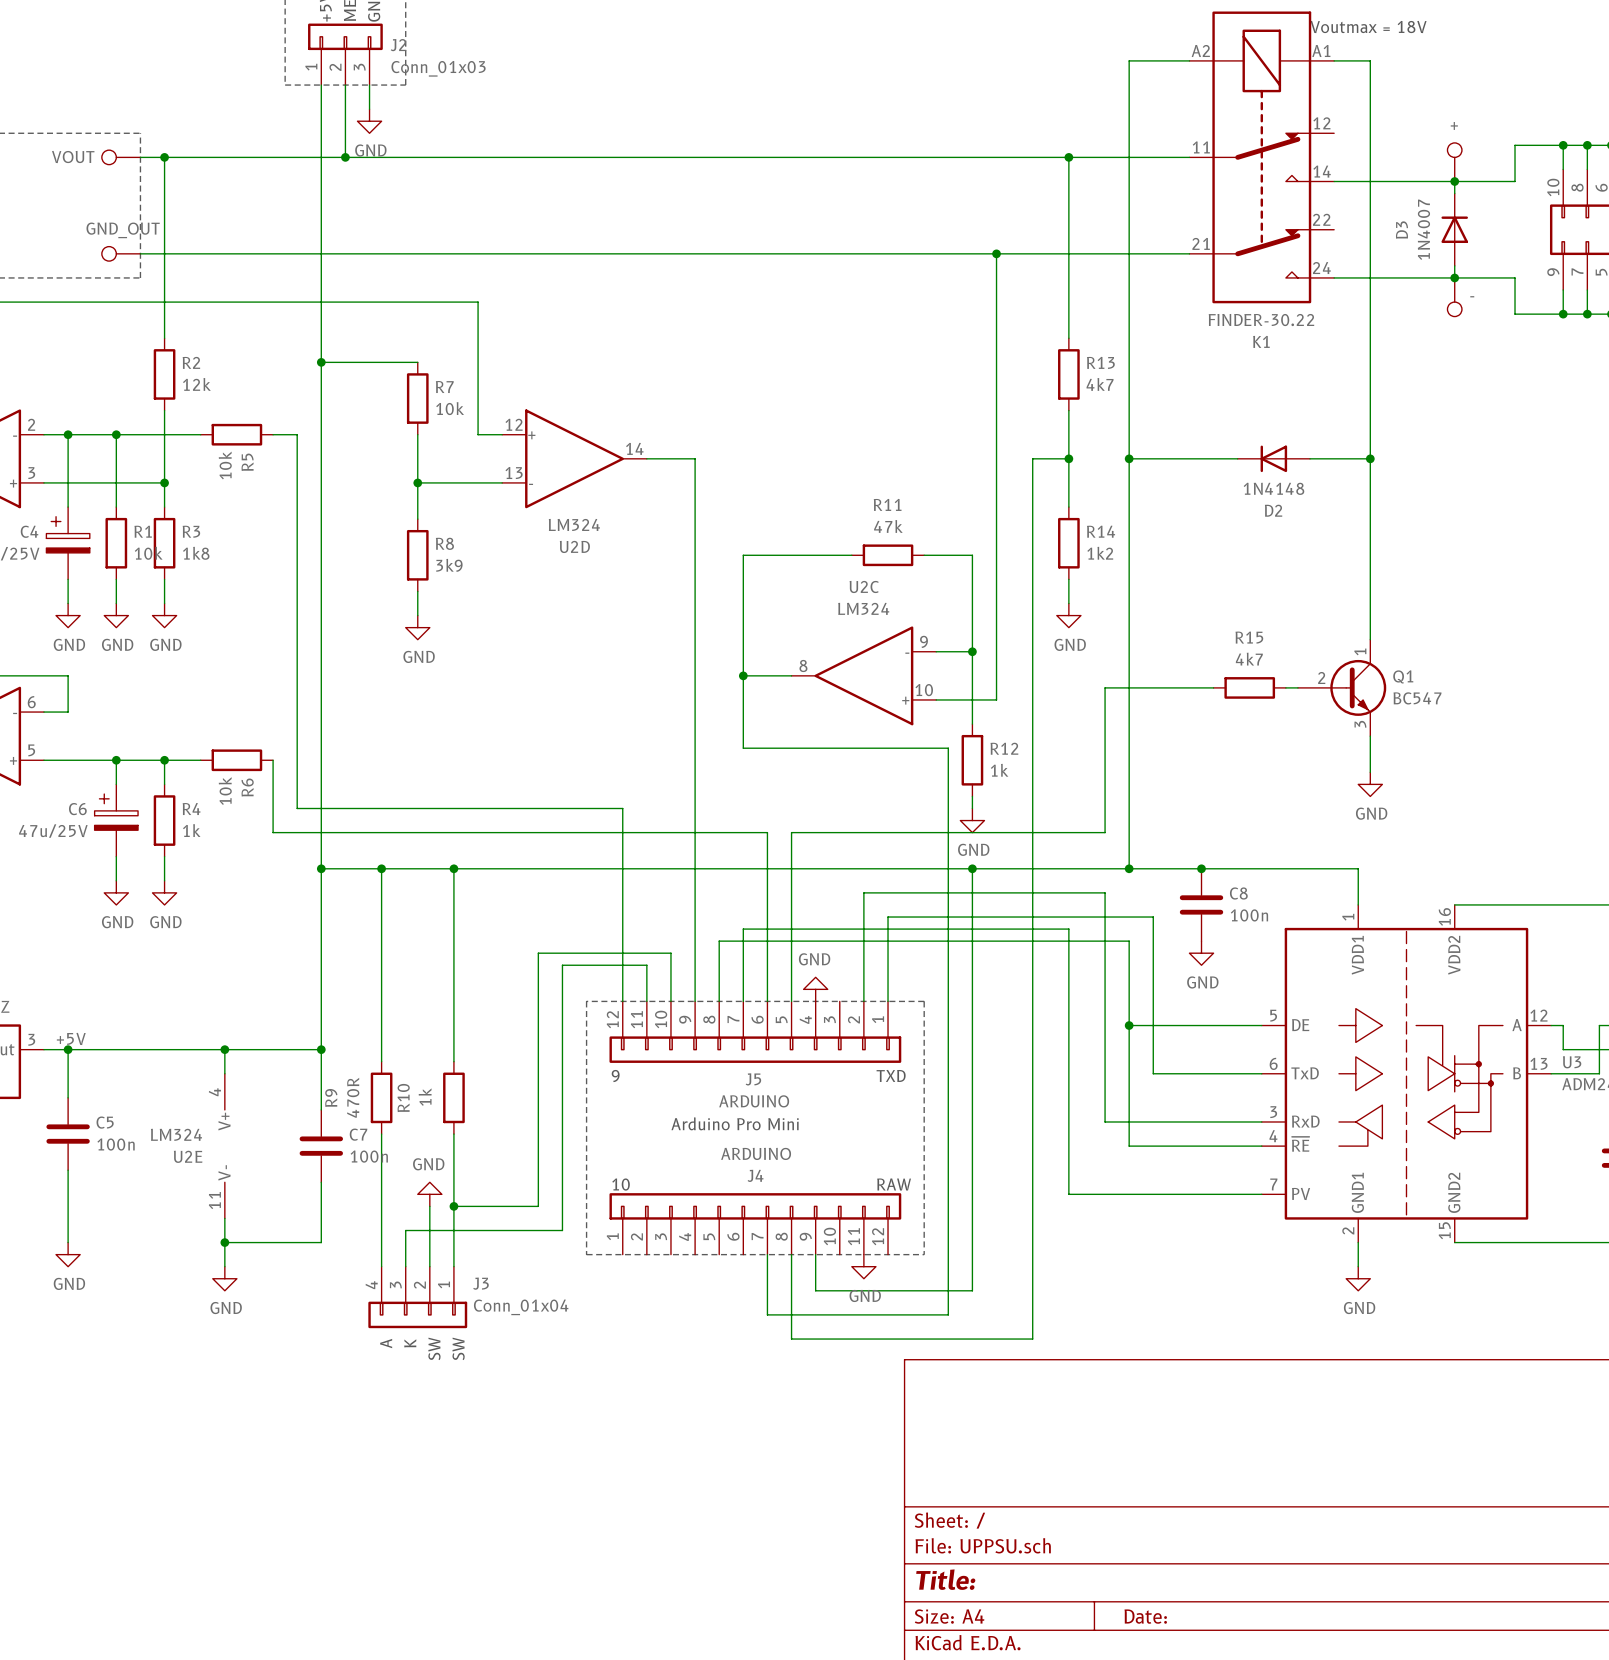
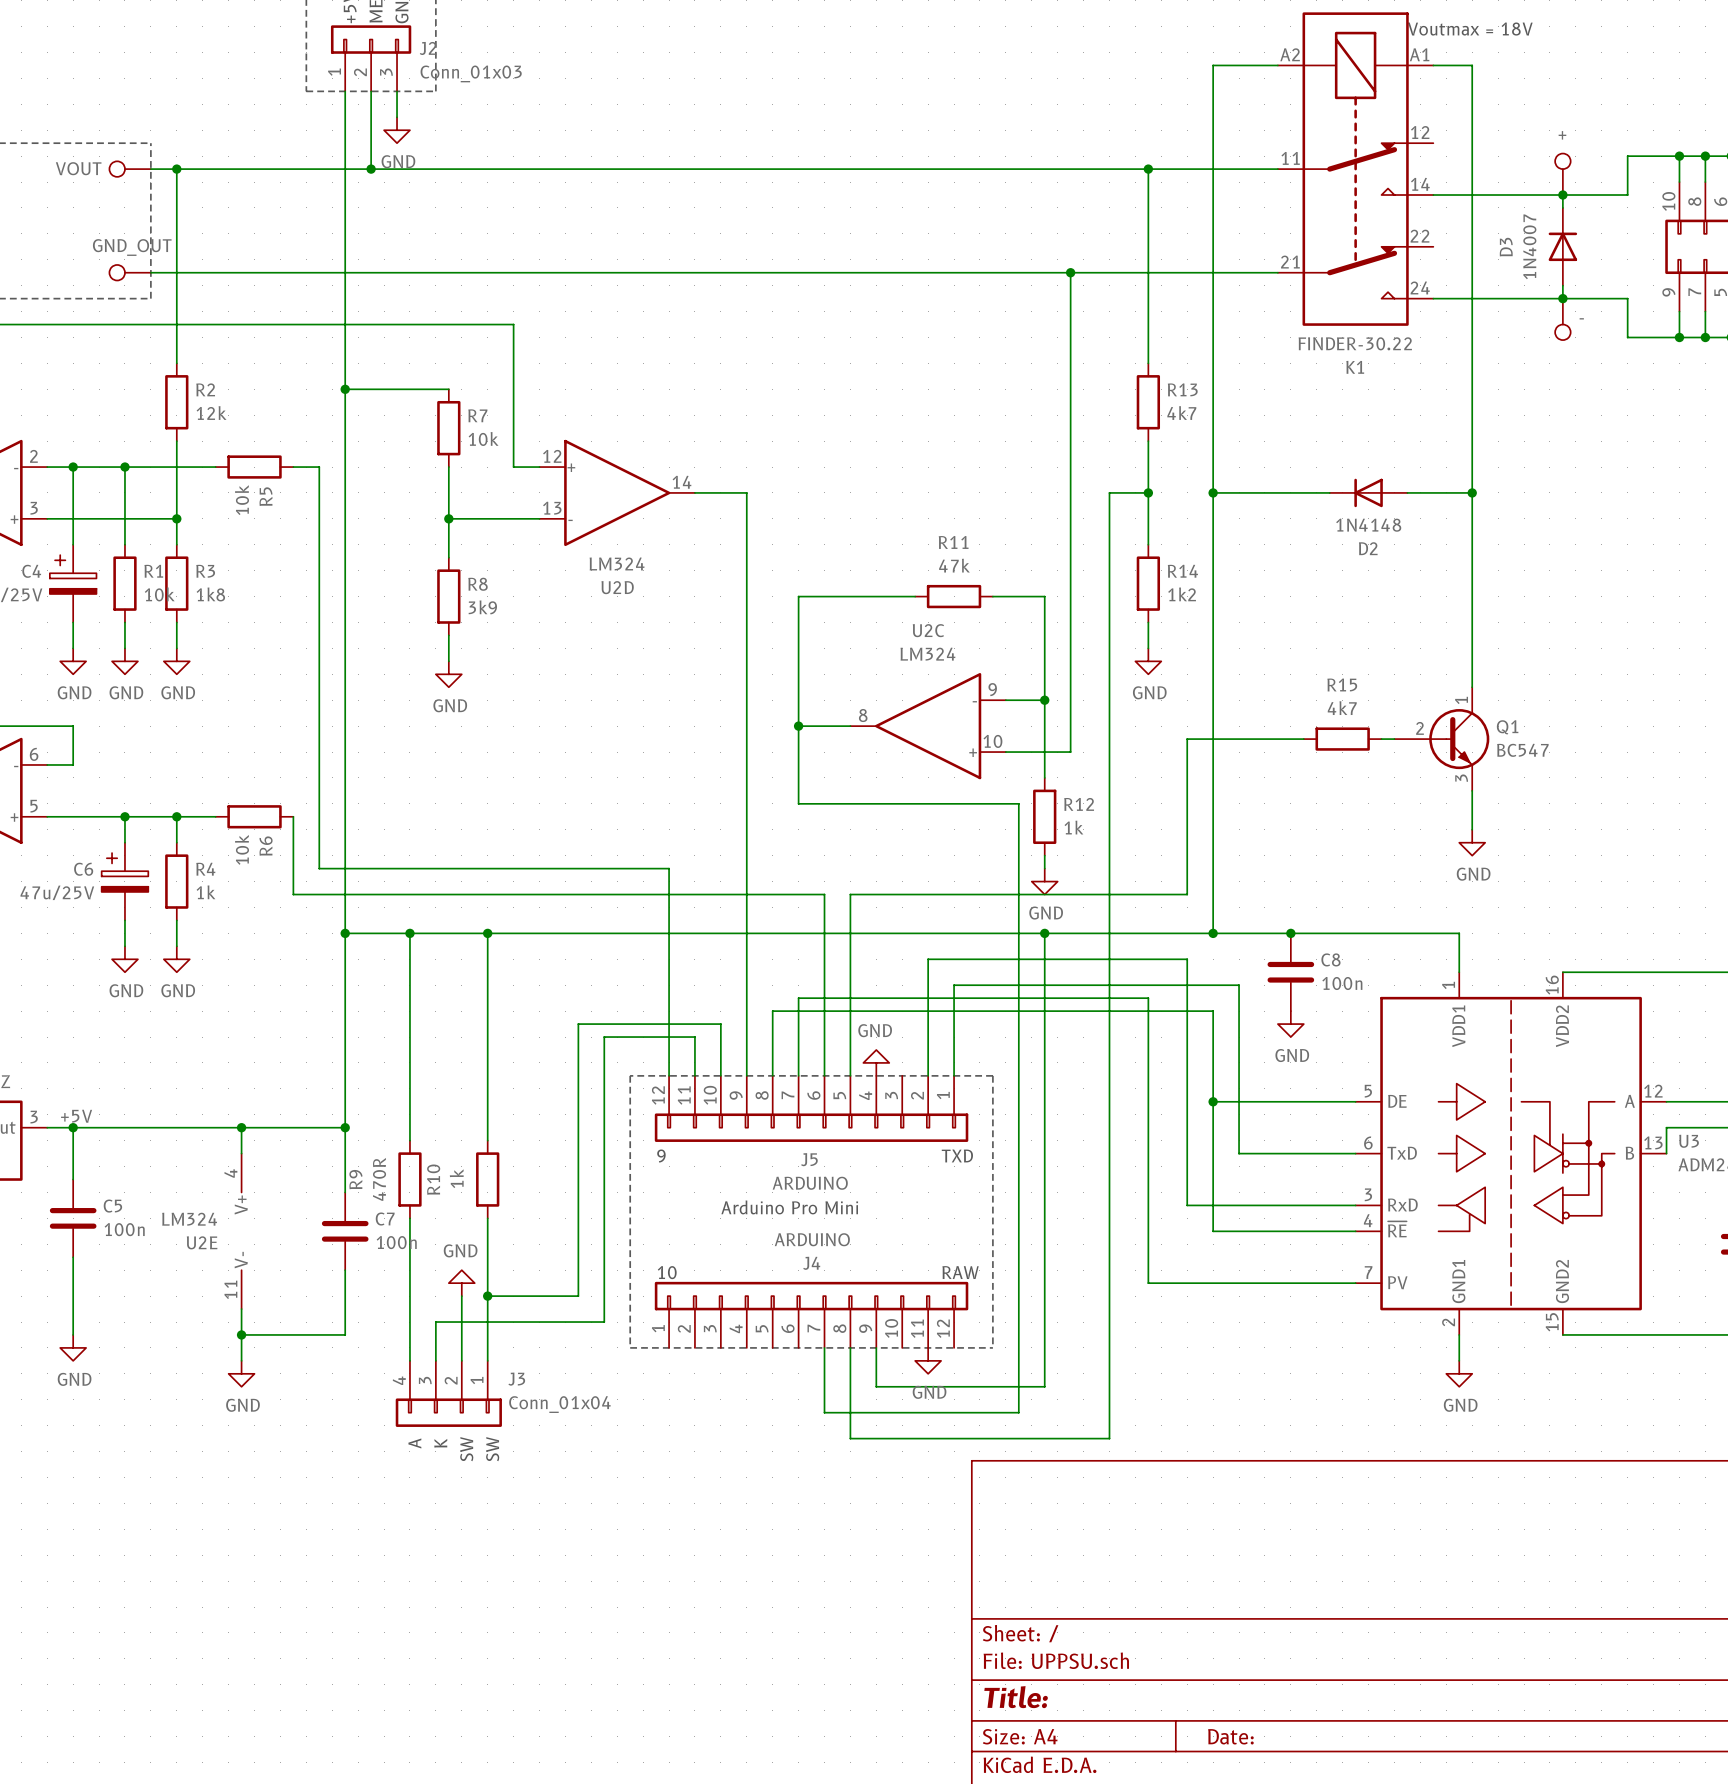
wire: (1563, 1025) (1563, 1049) -> (1679, 1101) (1718, 1101)
wire: (1599, 1025) (1599, 1073) (1551, 1073) -> (1679, 1127) (1666, 1127) (1666, 1153)

